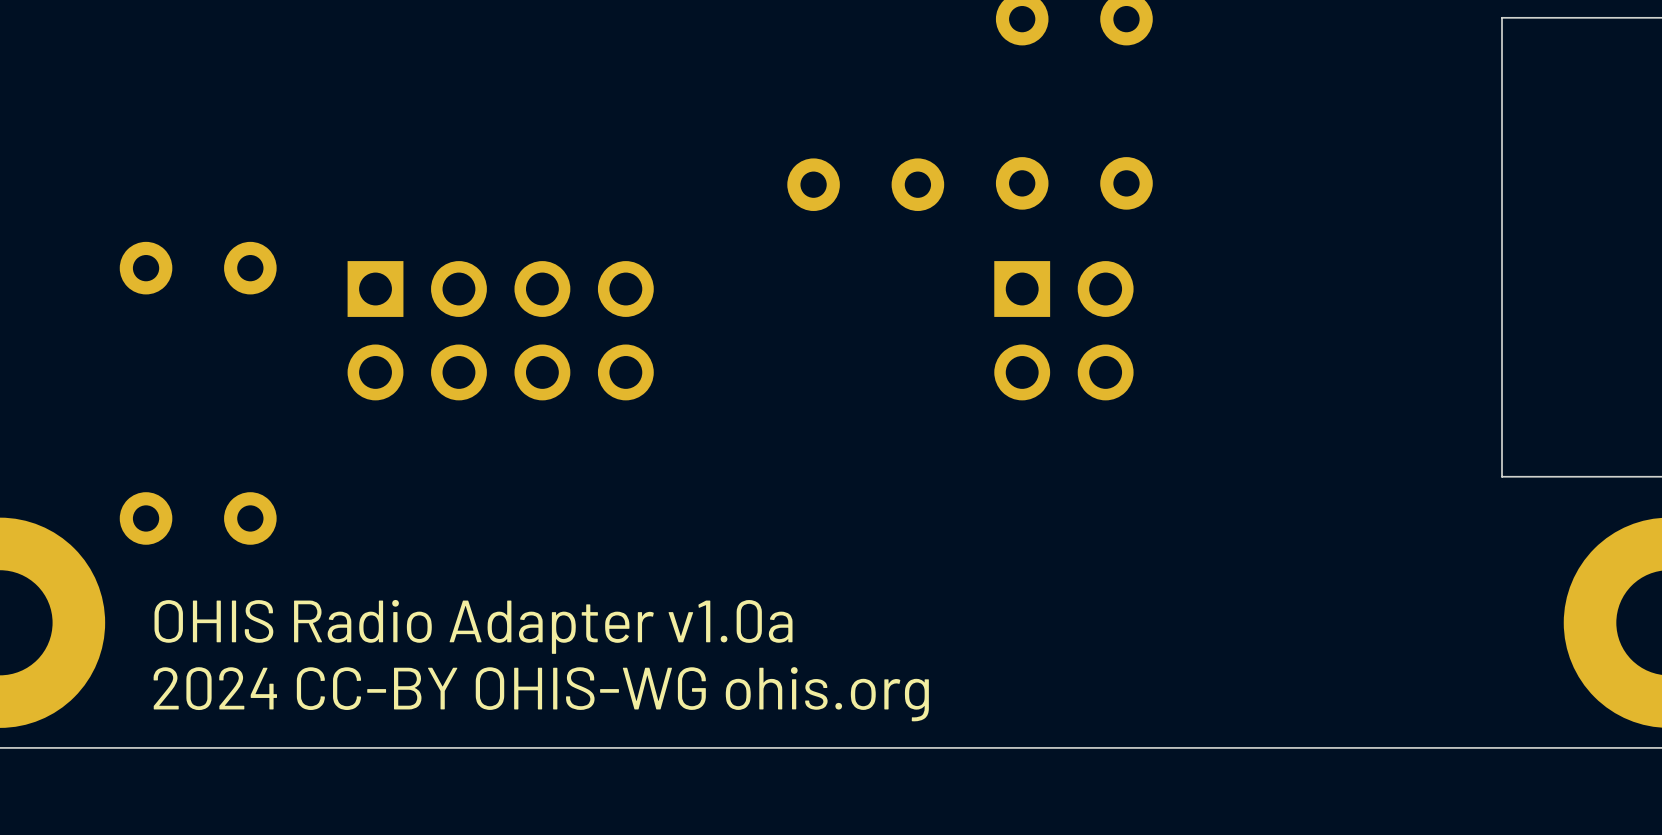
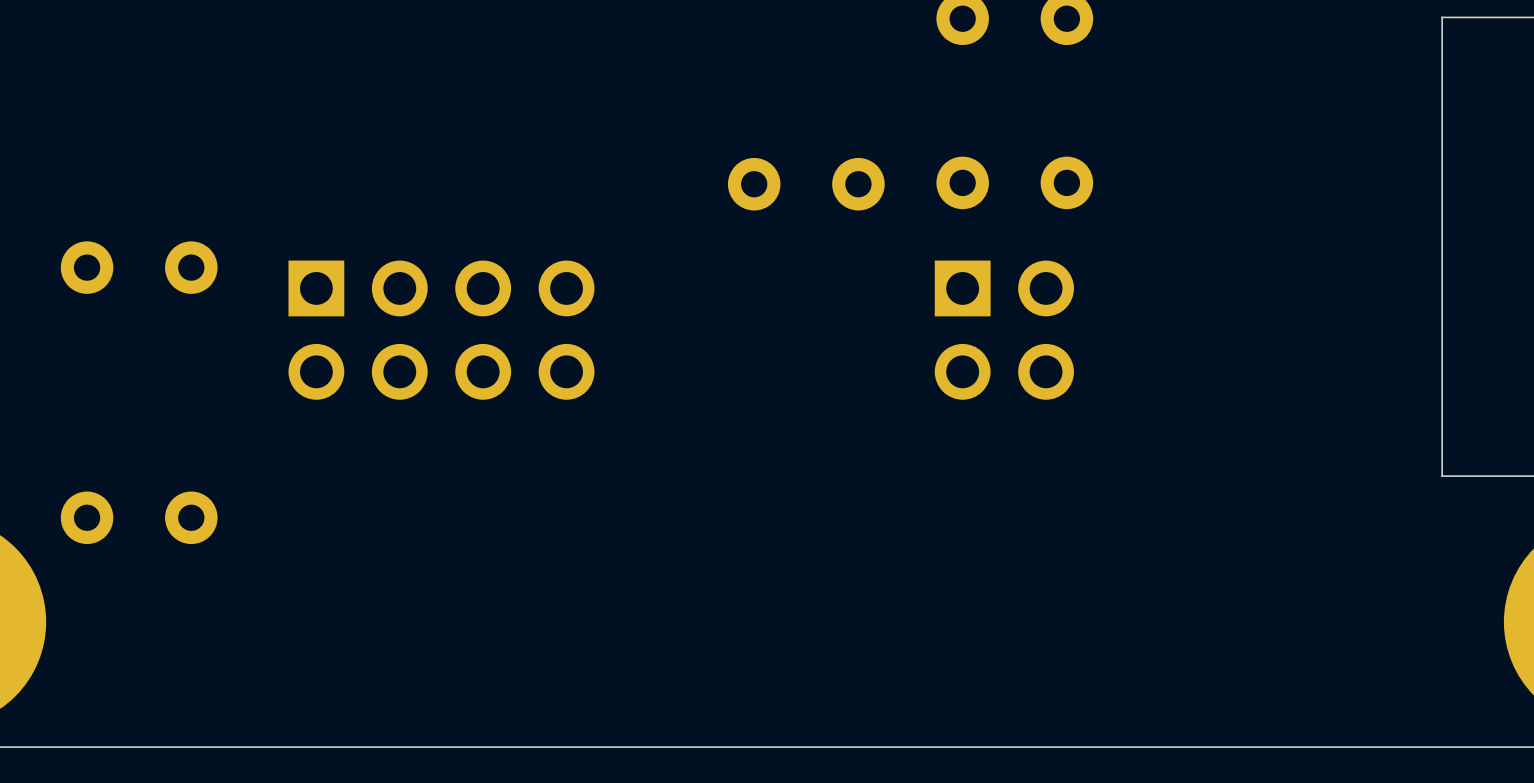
text: OHIS Radio Adapter v1.0a (473, 626) -> none
text: 2024 CC-BY OHIS-WG ohis.org (541, 694) -> none

